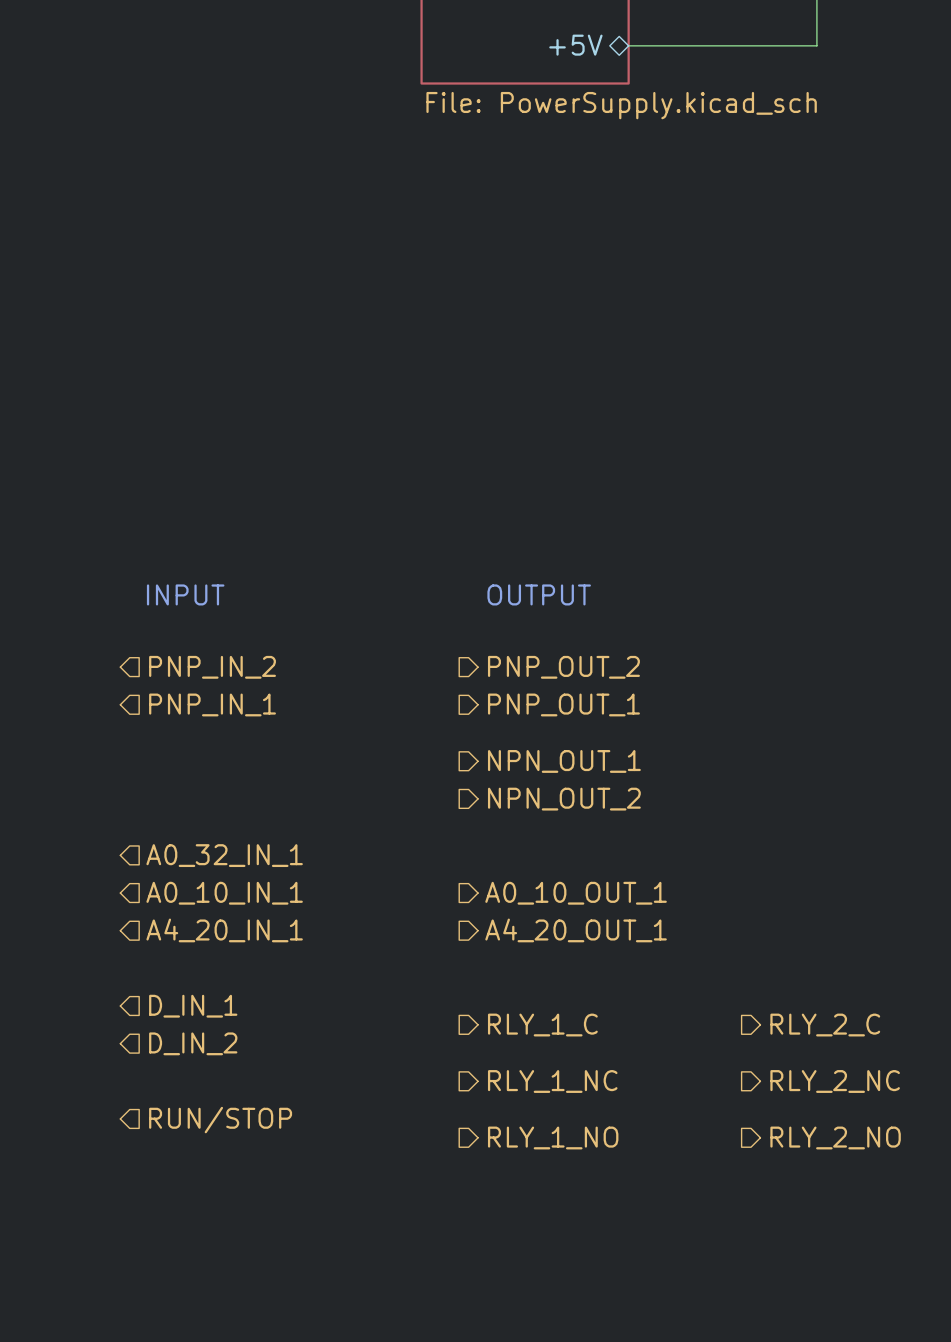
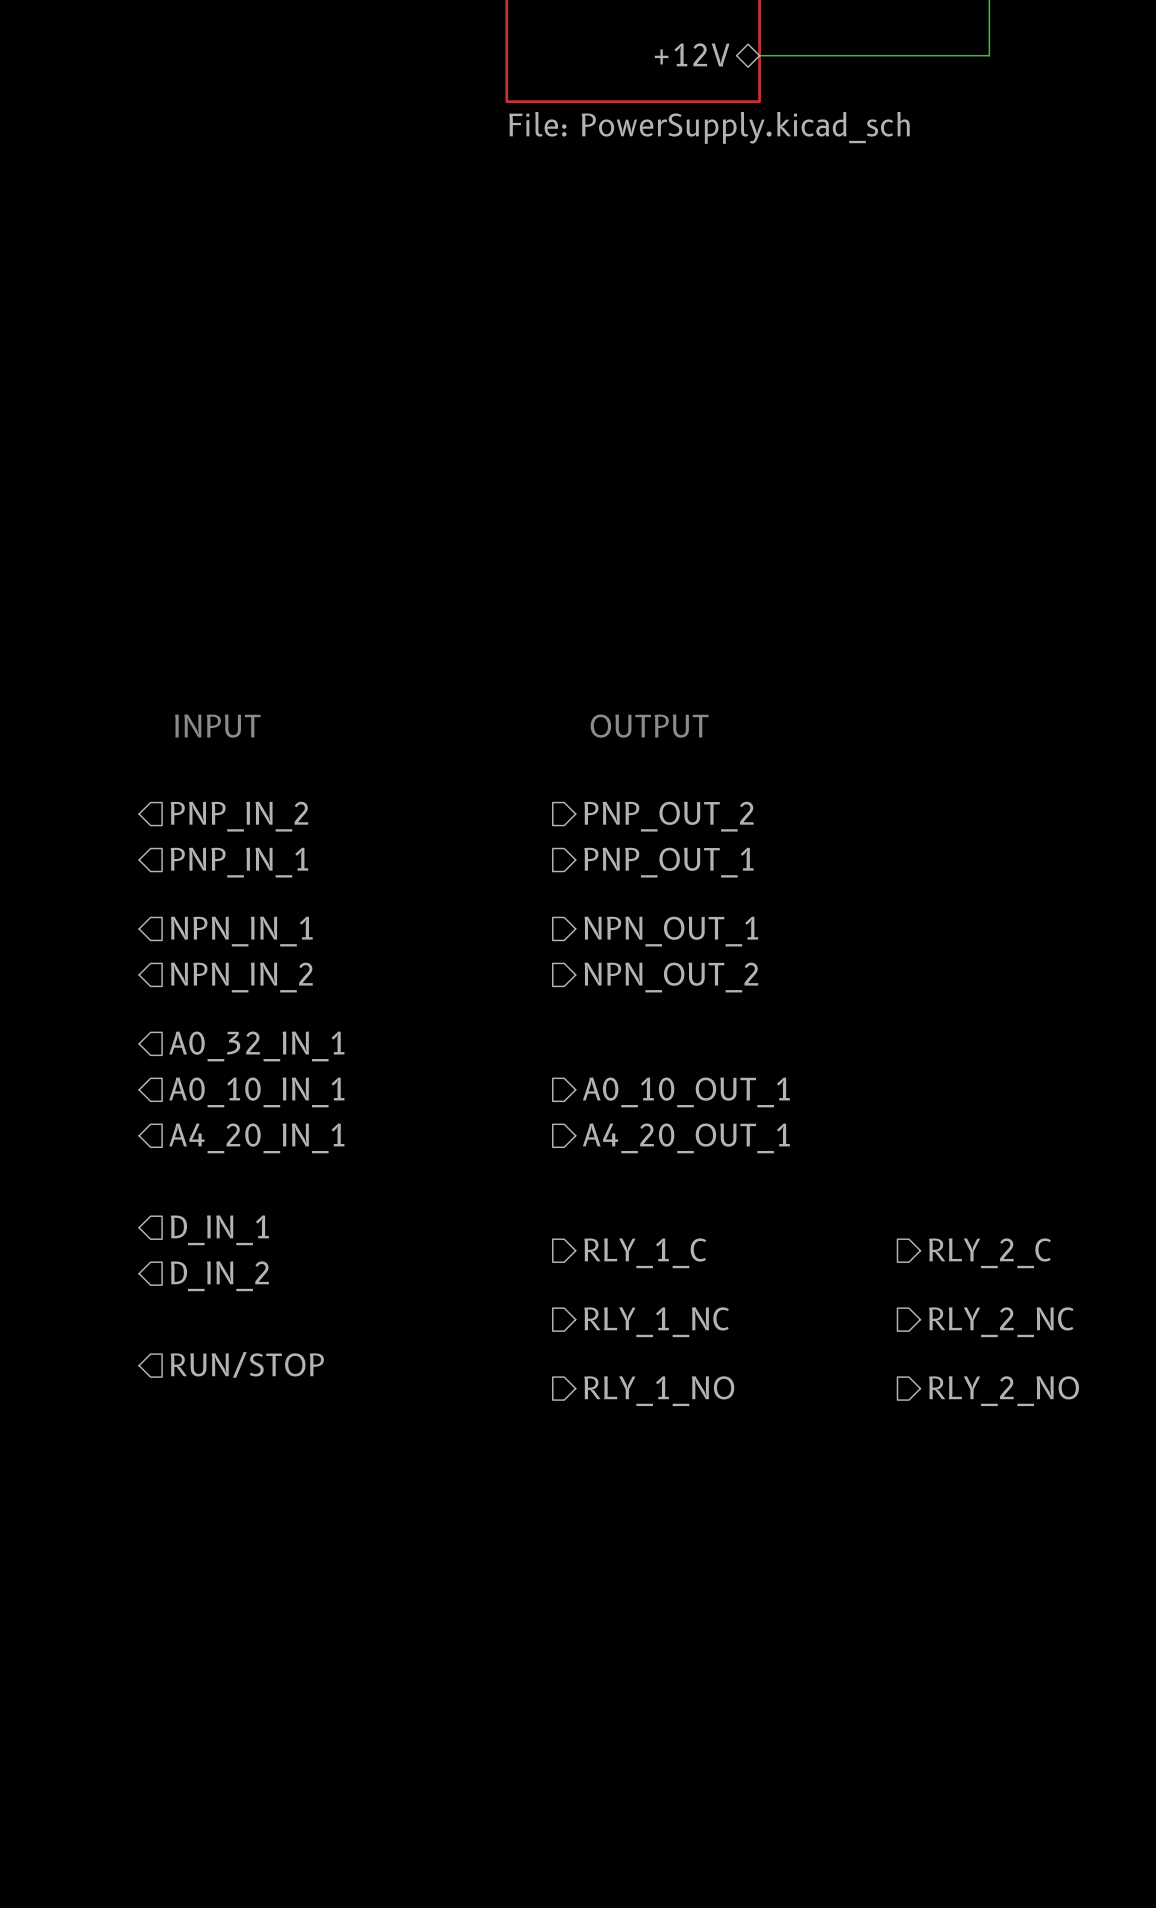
sheet pin: +5V (575, 45) -> +12V (692, 54)
hierarchical label: none -> NPN_IN_1 (241, 931)
hierarchical label: none -> NPN_IN_2 (241, 977)

